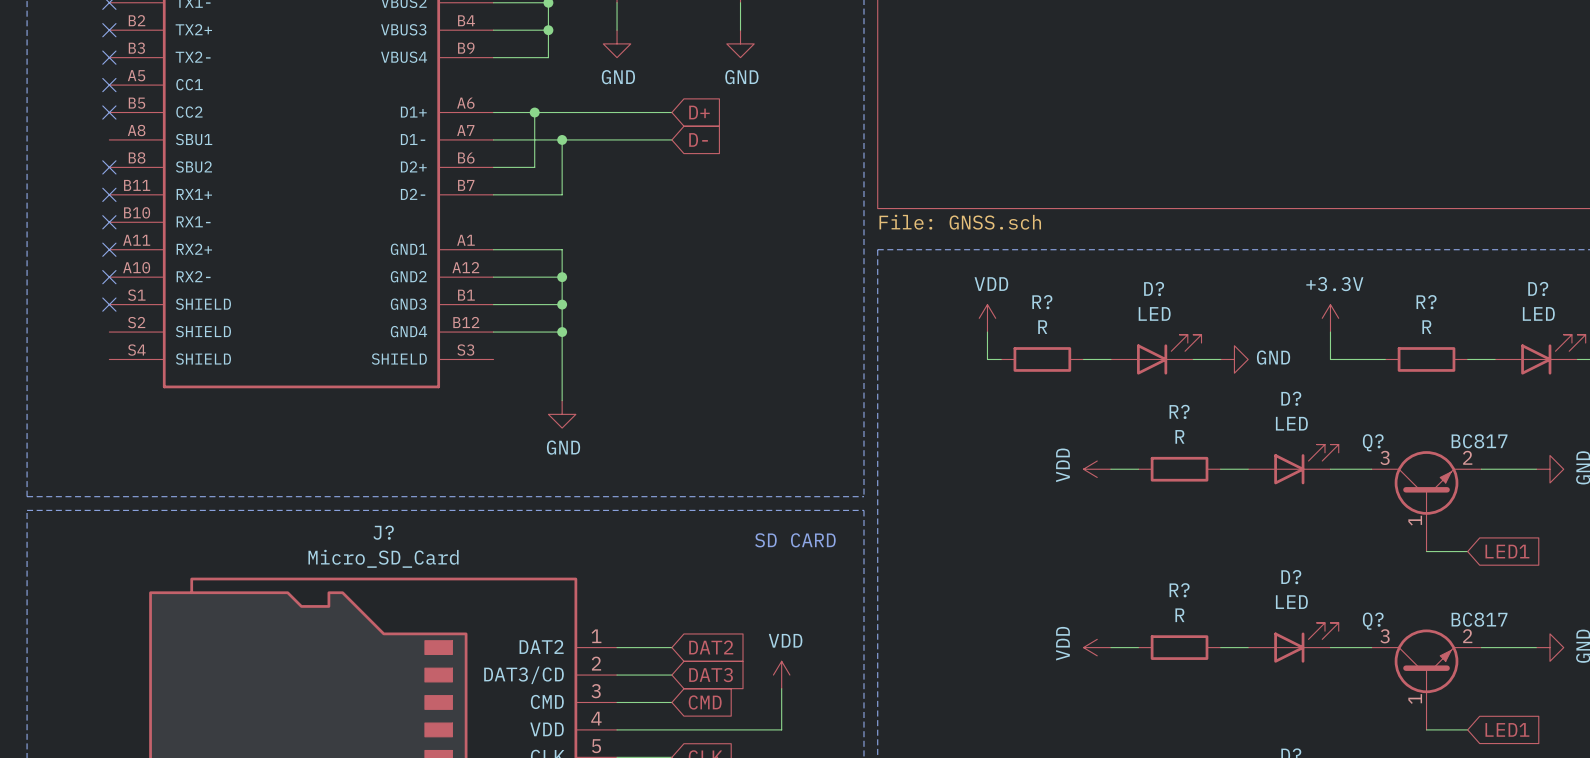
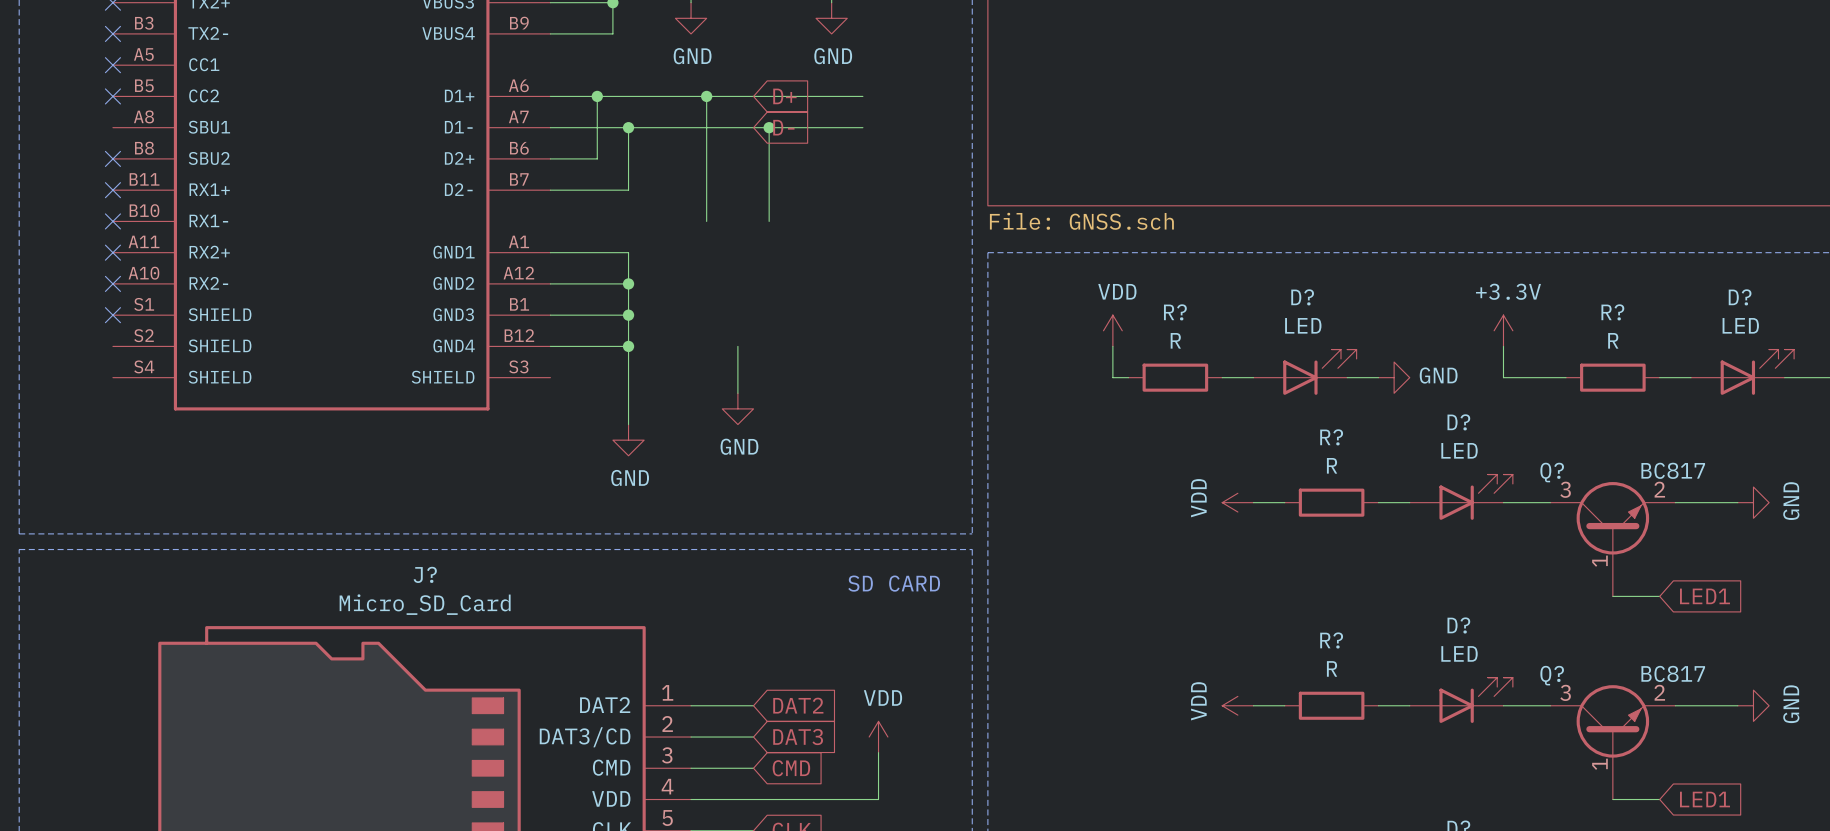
wire: none -> (706, 96) (706, 221)
junction: none -> (706, 96)
wire: none -> (753, 96) (862, 96)
wire: none -> (753, 127) (862, 127)
wire: none -> (769, 127) (769, 221)
junction: none -> (769, 127)
wire: none -> (737, 346) (737, 393)
power symbol: none -> GND (737, 408)

